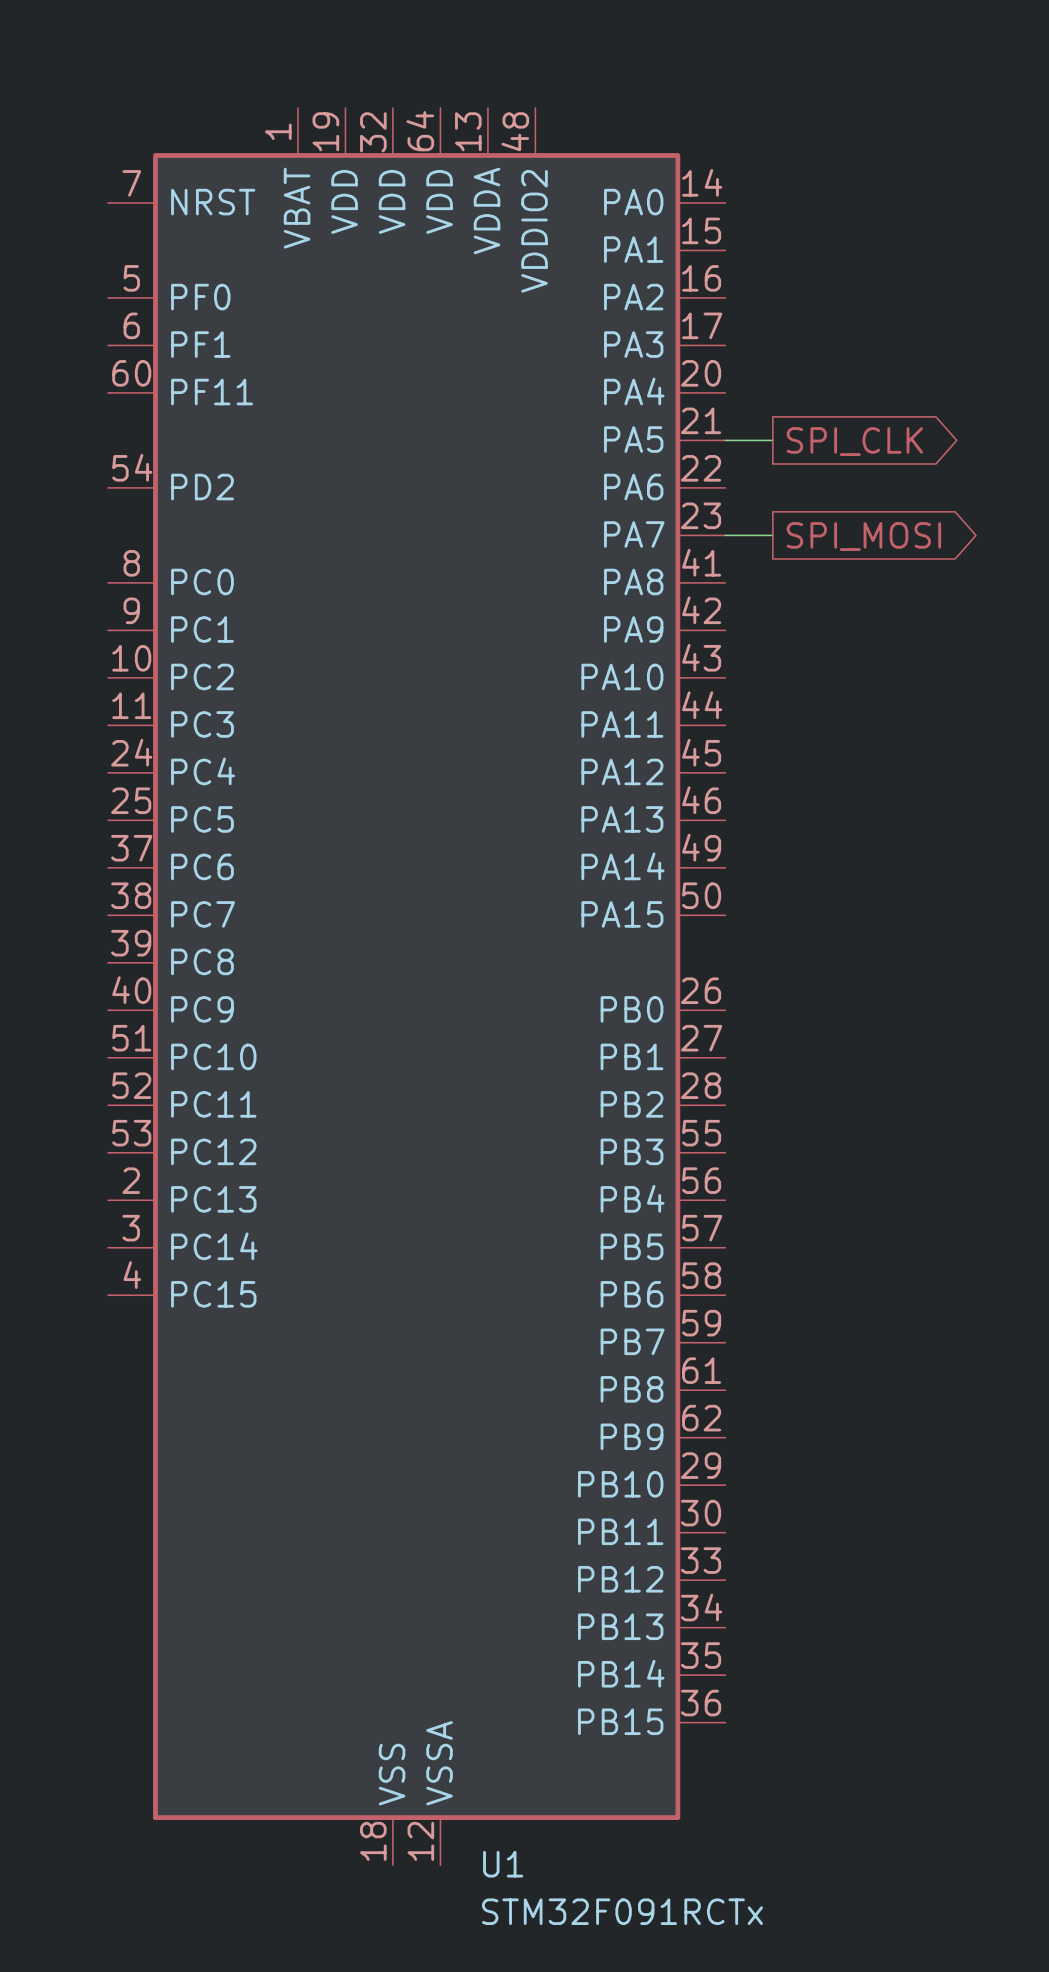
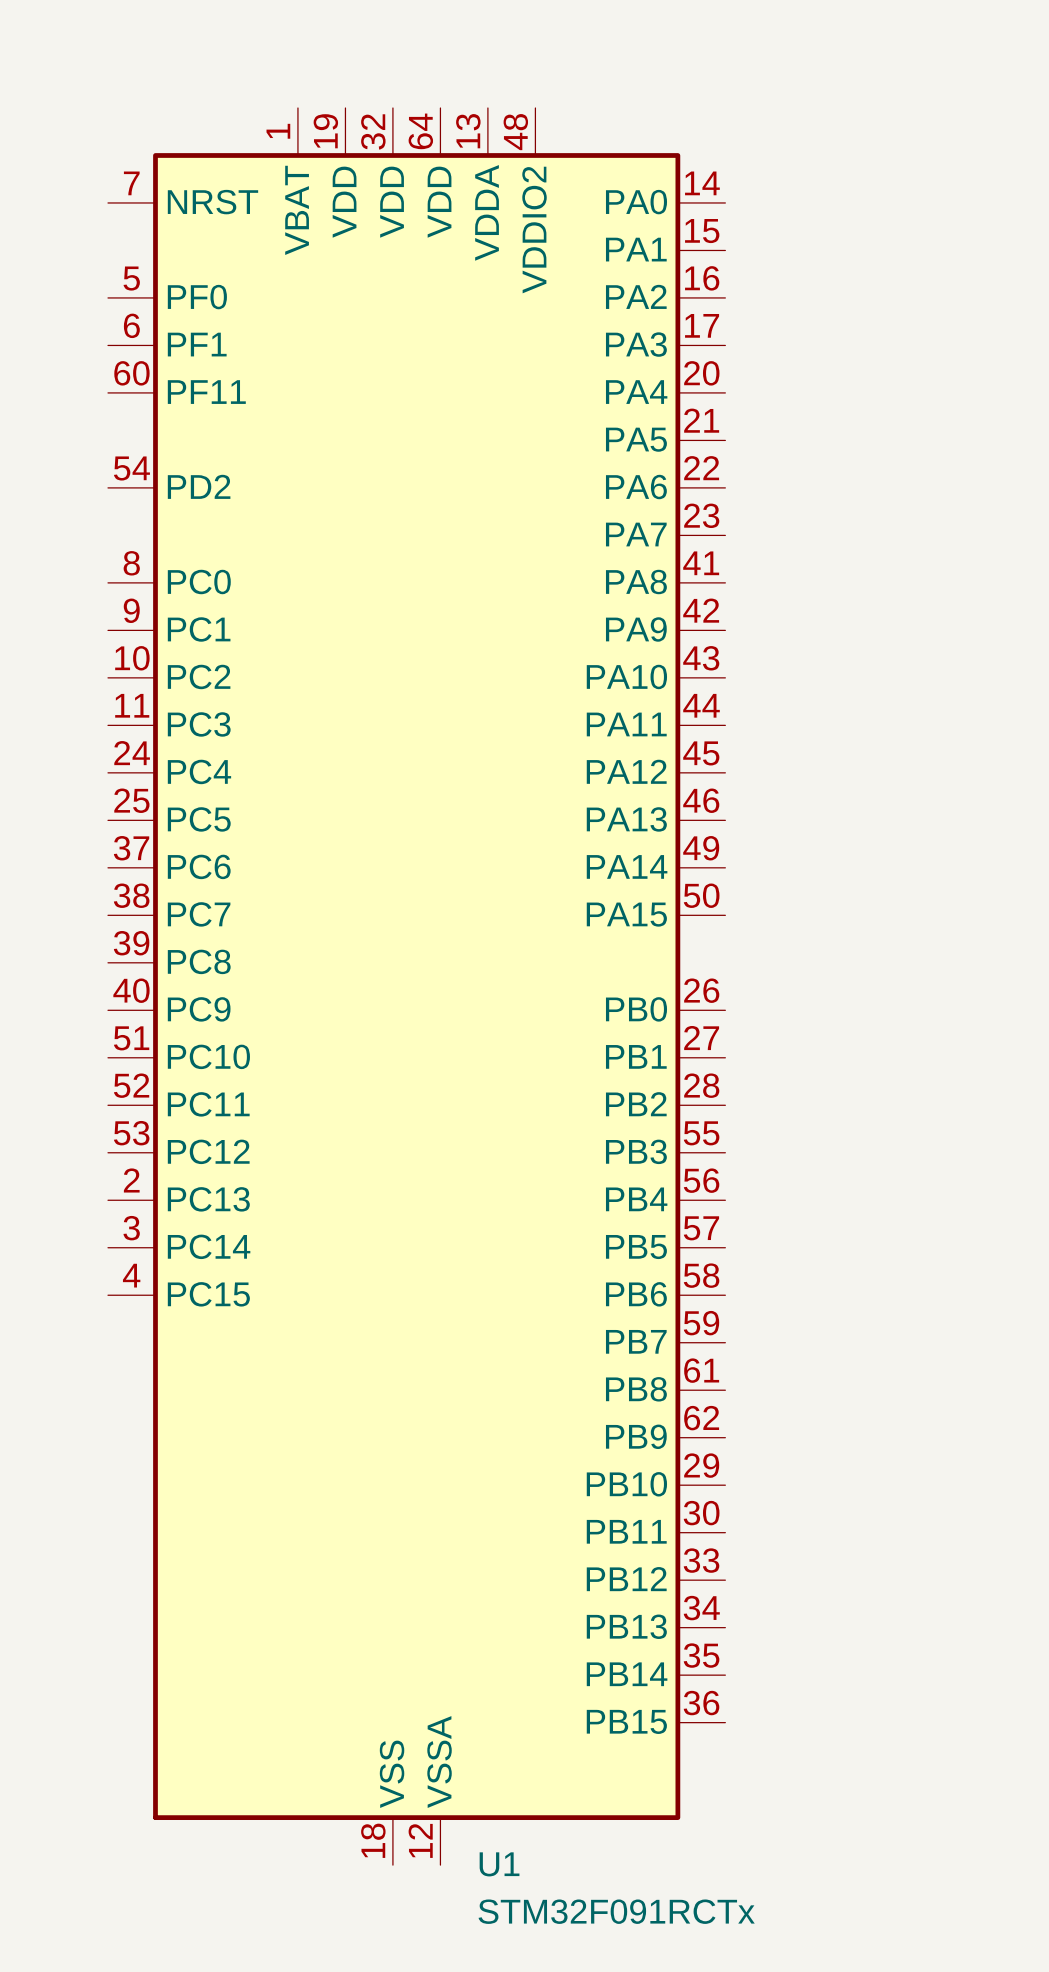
wire: (725, 440) (772, 440) -> none
global label: SPI_CLK (854, 441) -> none
wire: (725, 535) (772, 535) -> none
global label: SPI_MOSI (863, 536) -> none

